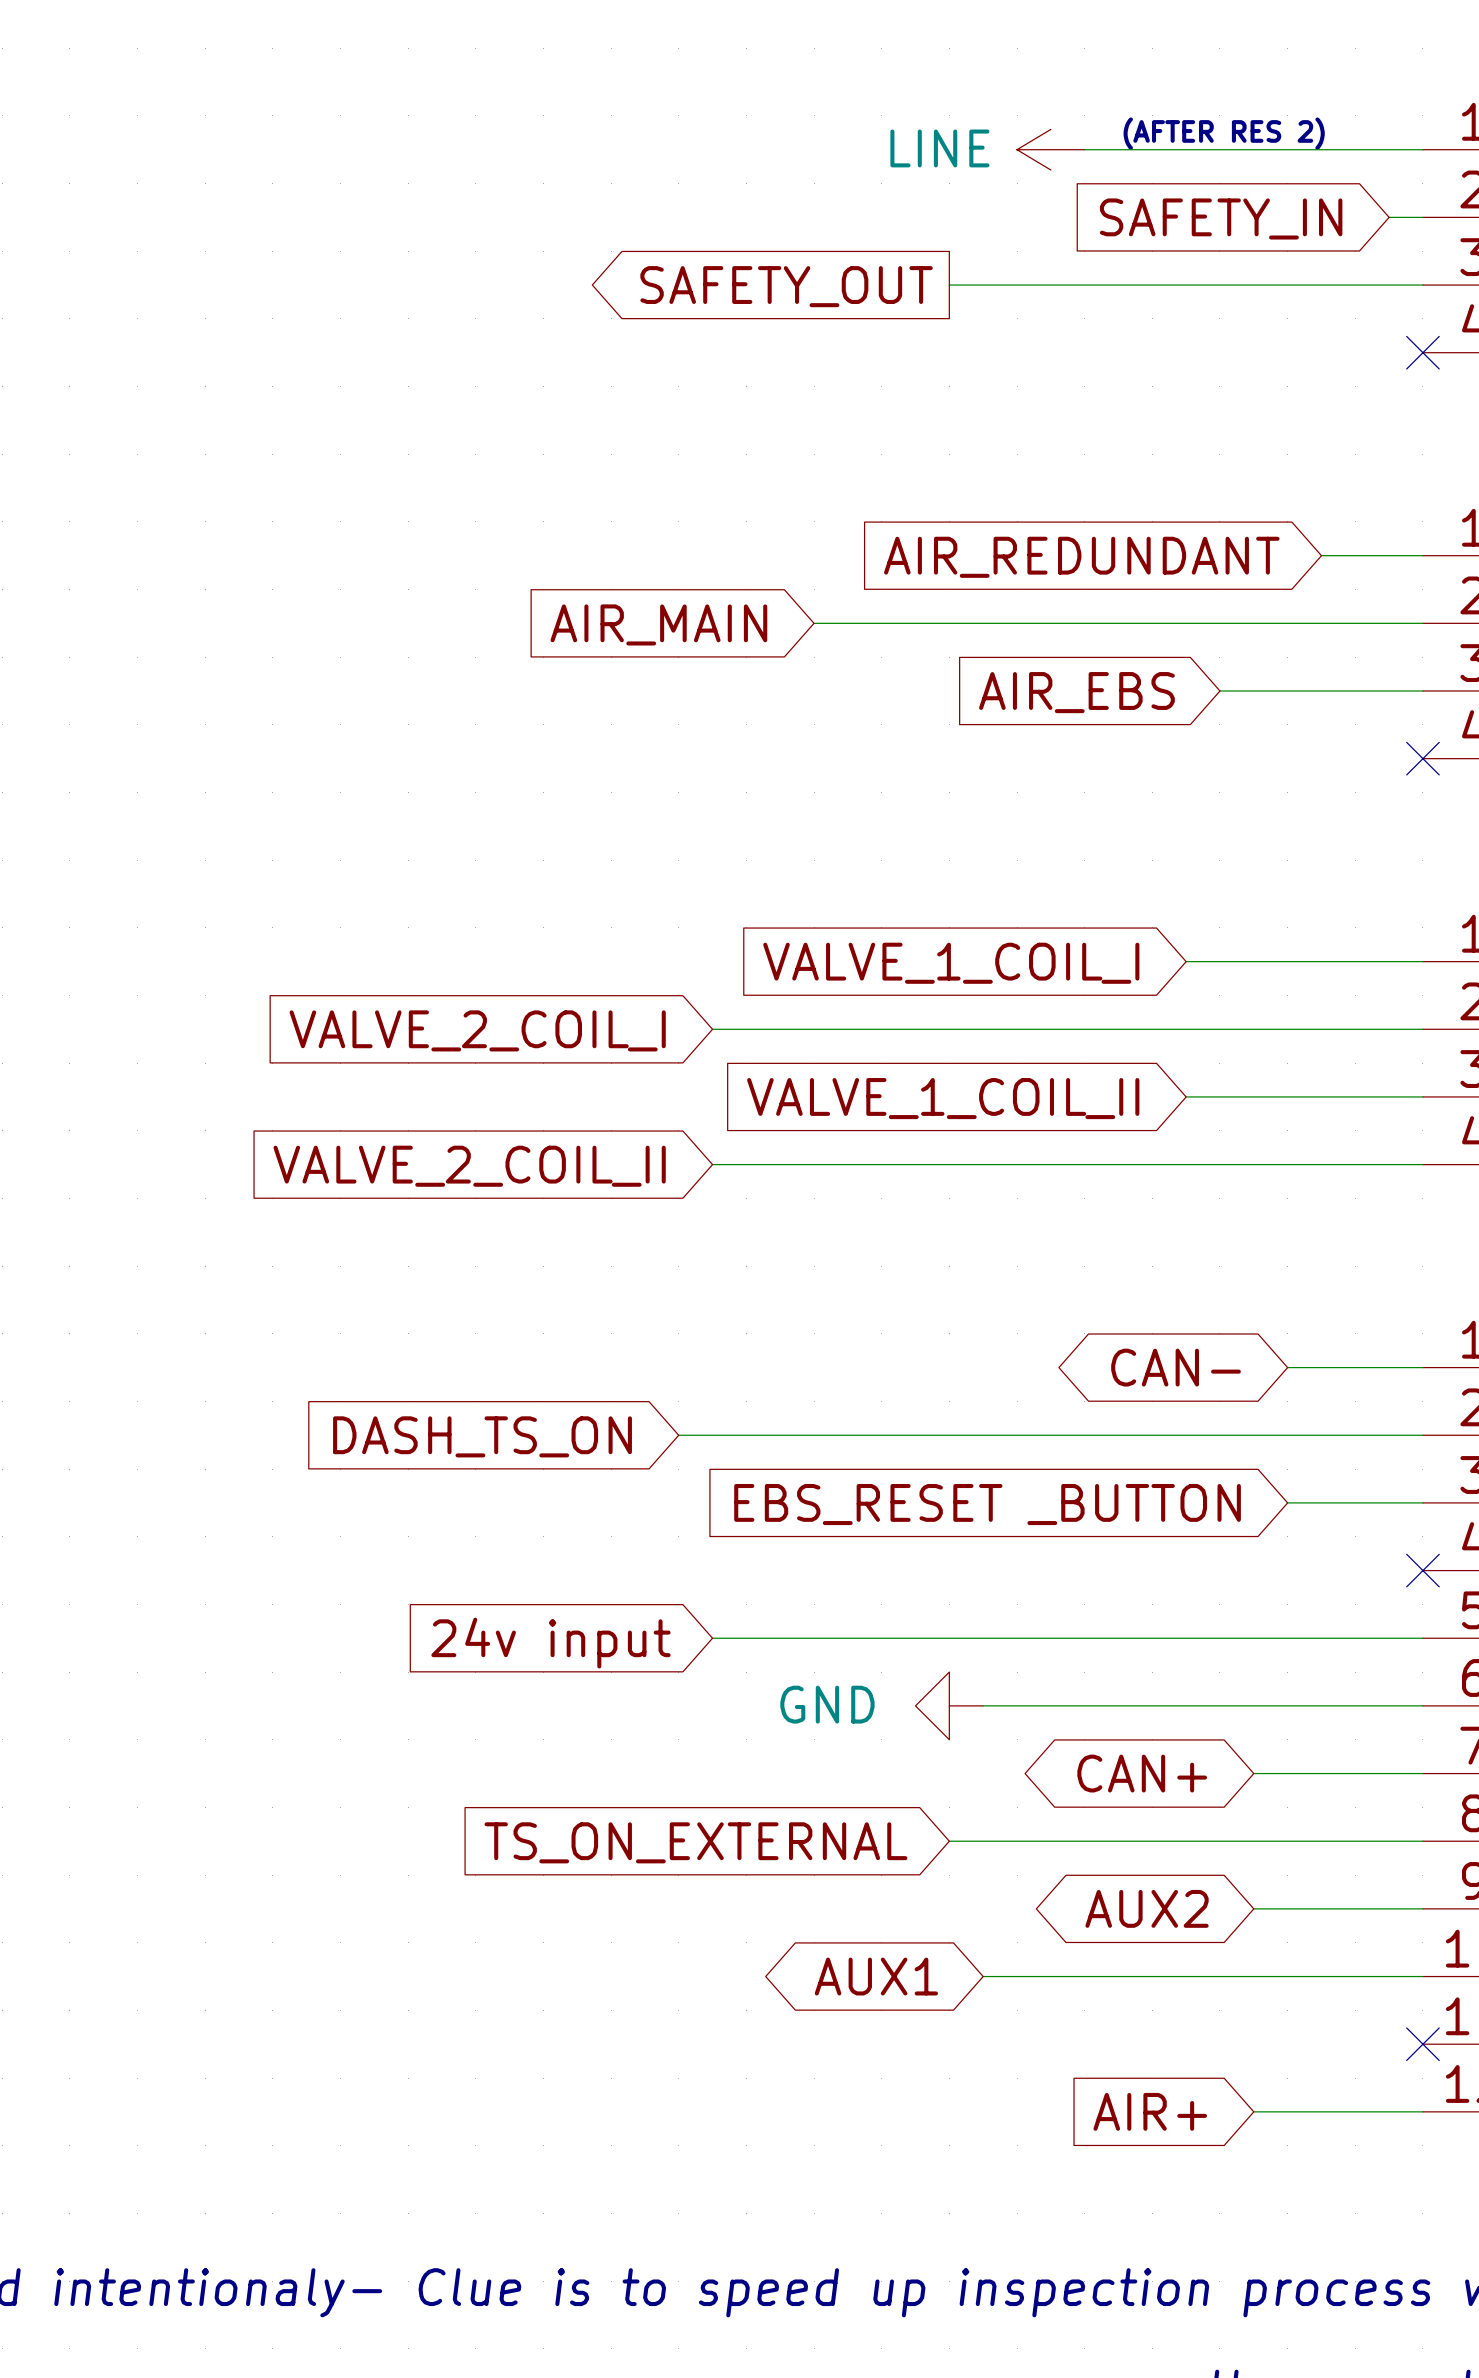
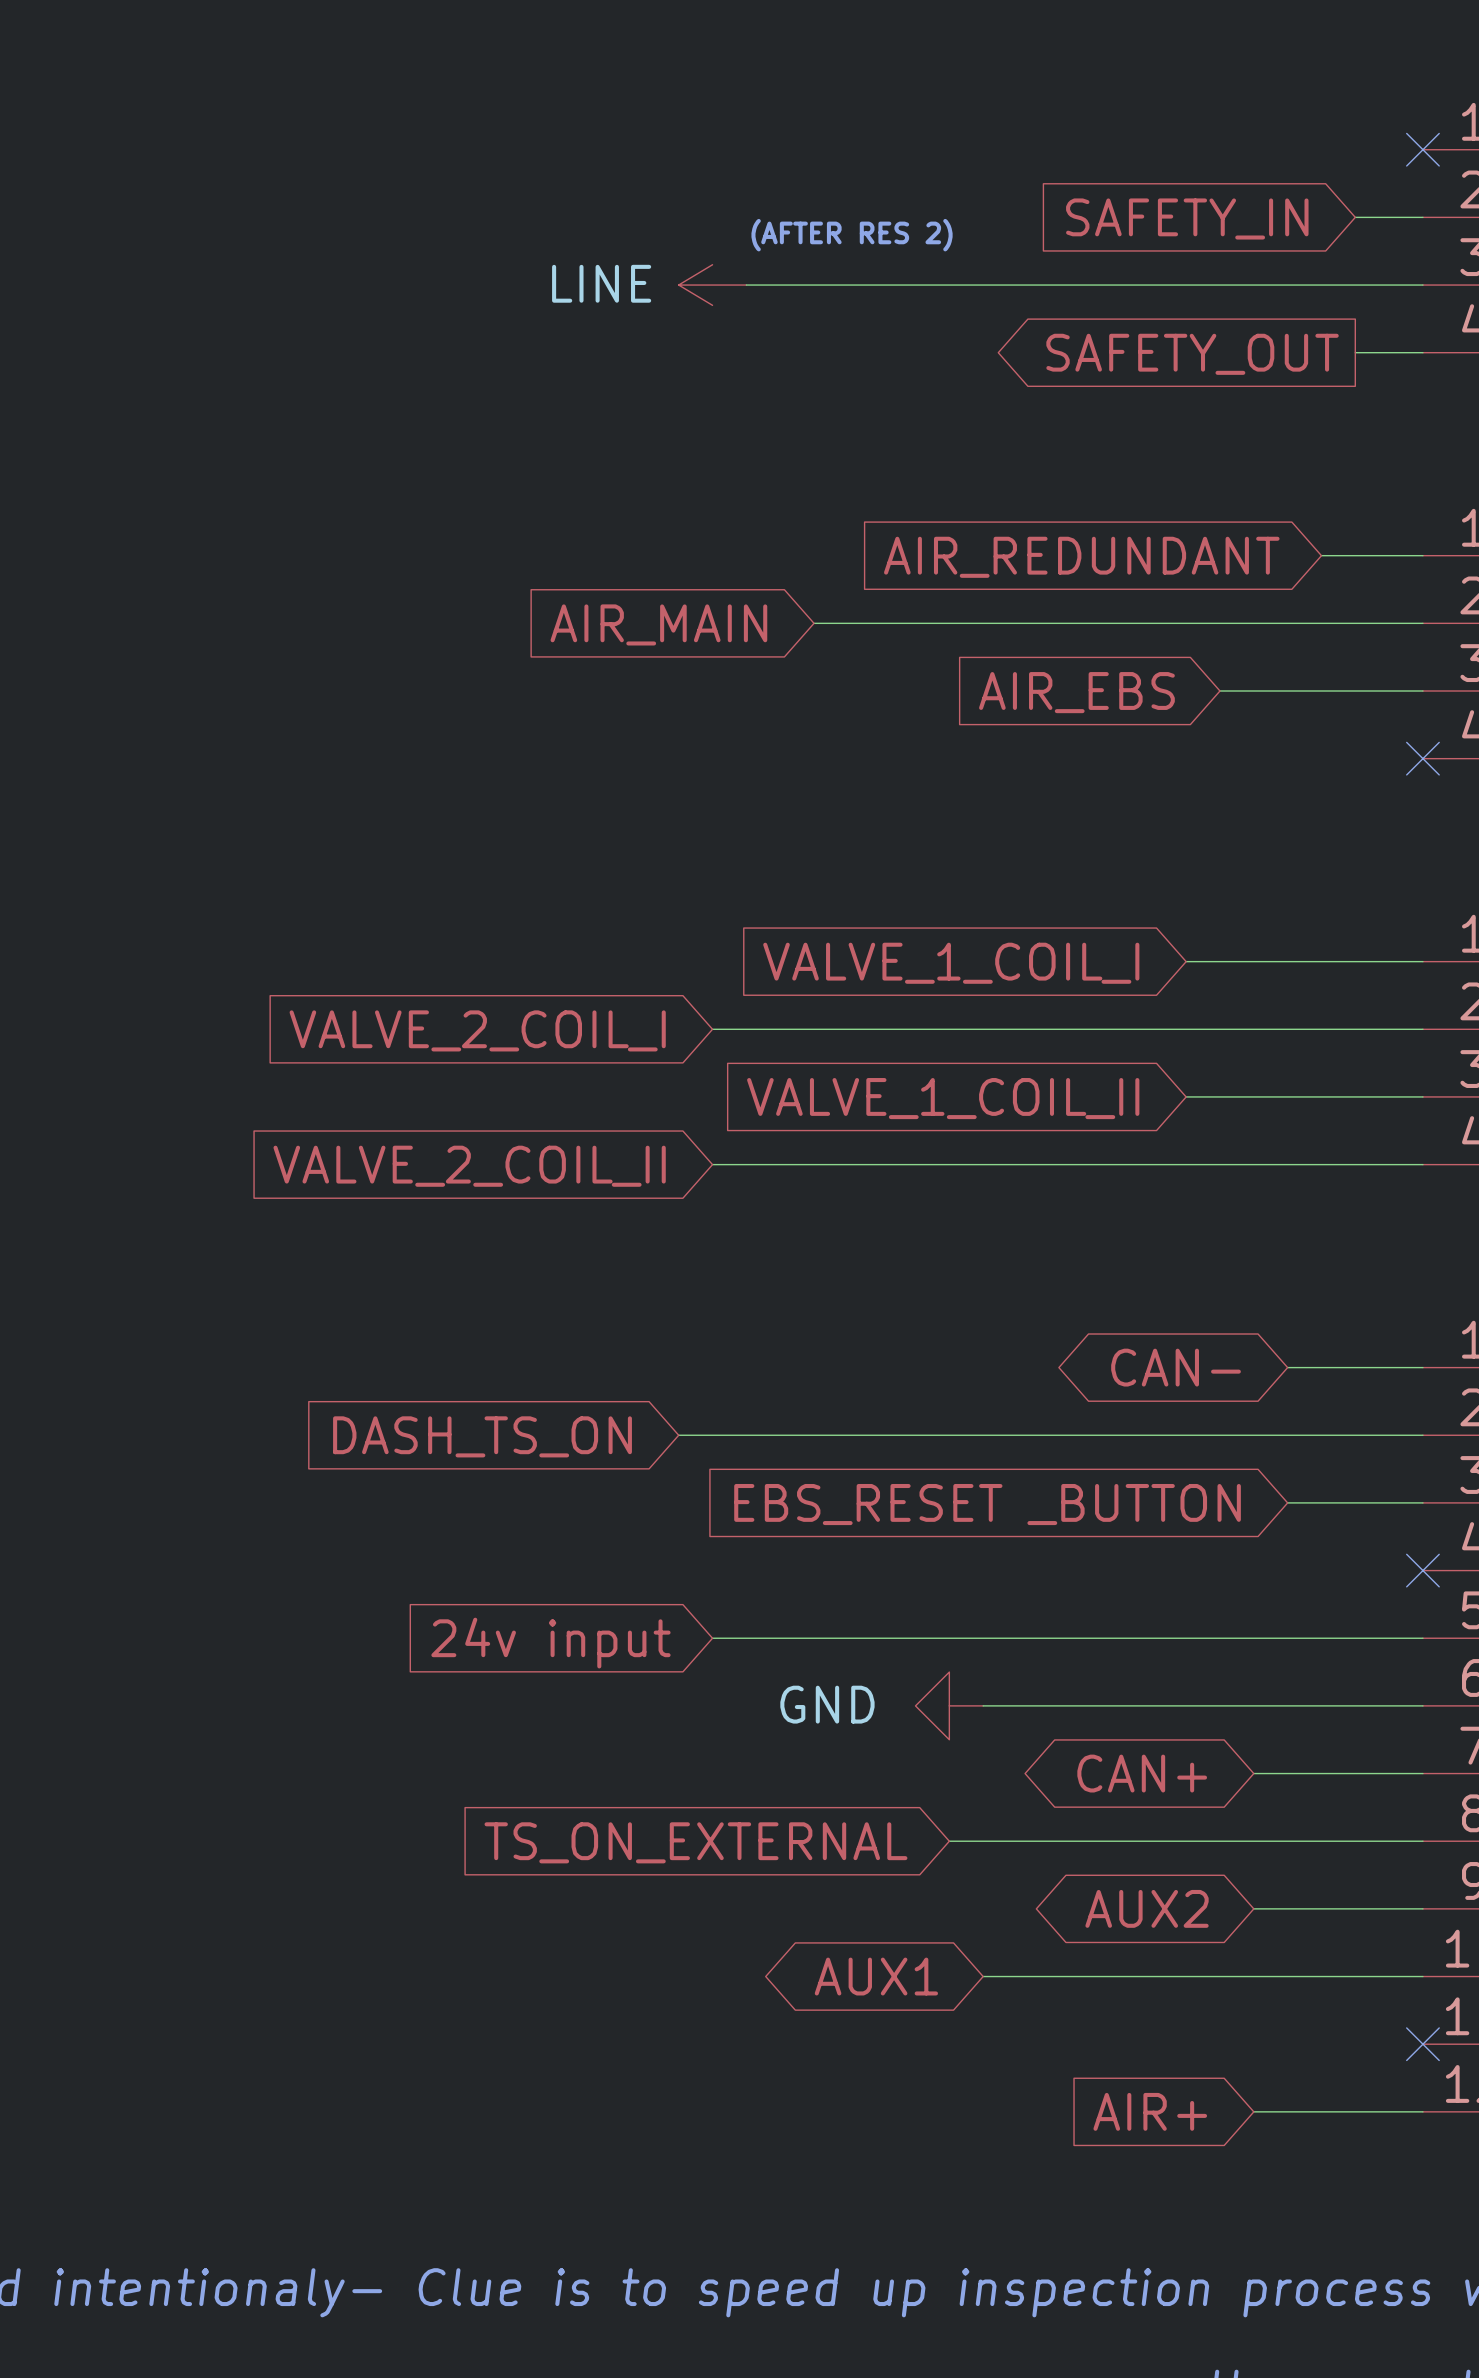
text position: (AFTER RES 2) (1224, 133) -> (AFTER RES 2) (852, 235)
power symbol position: LINE (1050, 149) -> LINE (712, 285)
wire: (1084, 149) (1422, 149) -> none
no-connect mark: none -> (1422, 149)
wire: none -> (1355, 217) (1389, 217)
global label position: SAFETY_IN (1221, 218) -> SAFETY_IN (1187, 218)
wire: none -> (746, 285) (949, 285)
global label position: SAFETY_OUT (786, 286) -> SAFETY_OUT (1192, 354)
wire: none -> (1355, 352) (1422, 352)
no-connect mark: (1422, 352) -> none

